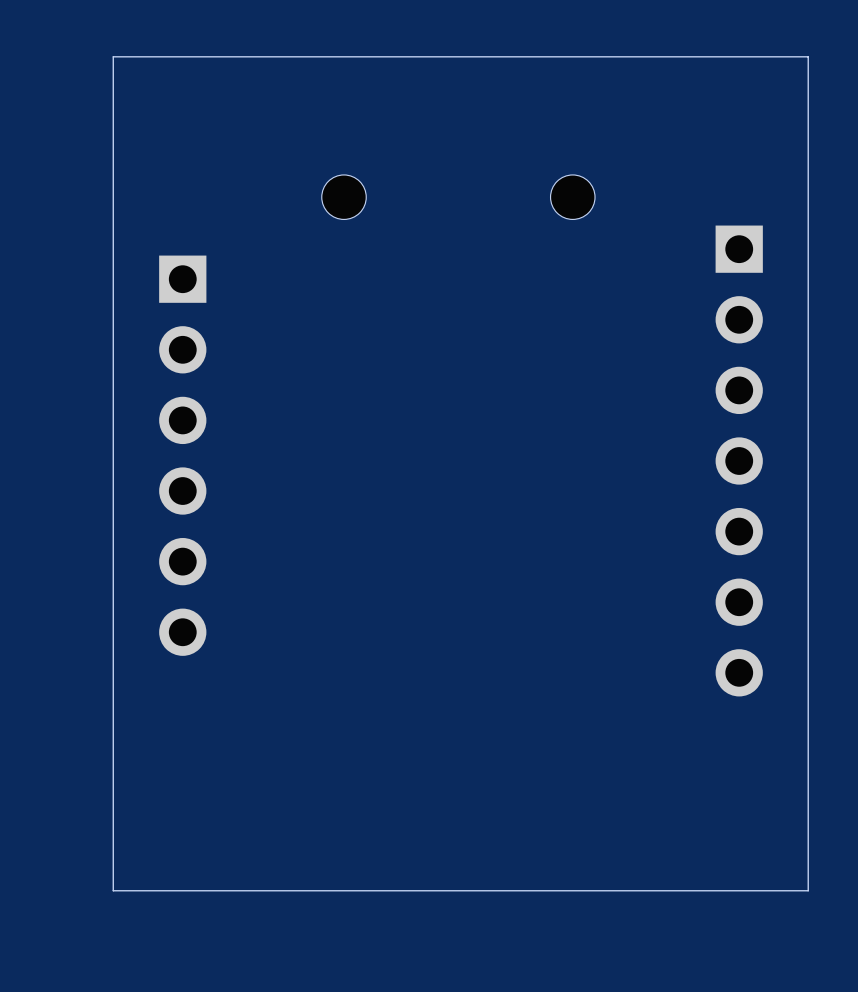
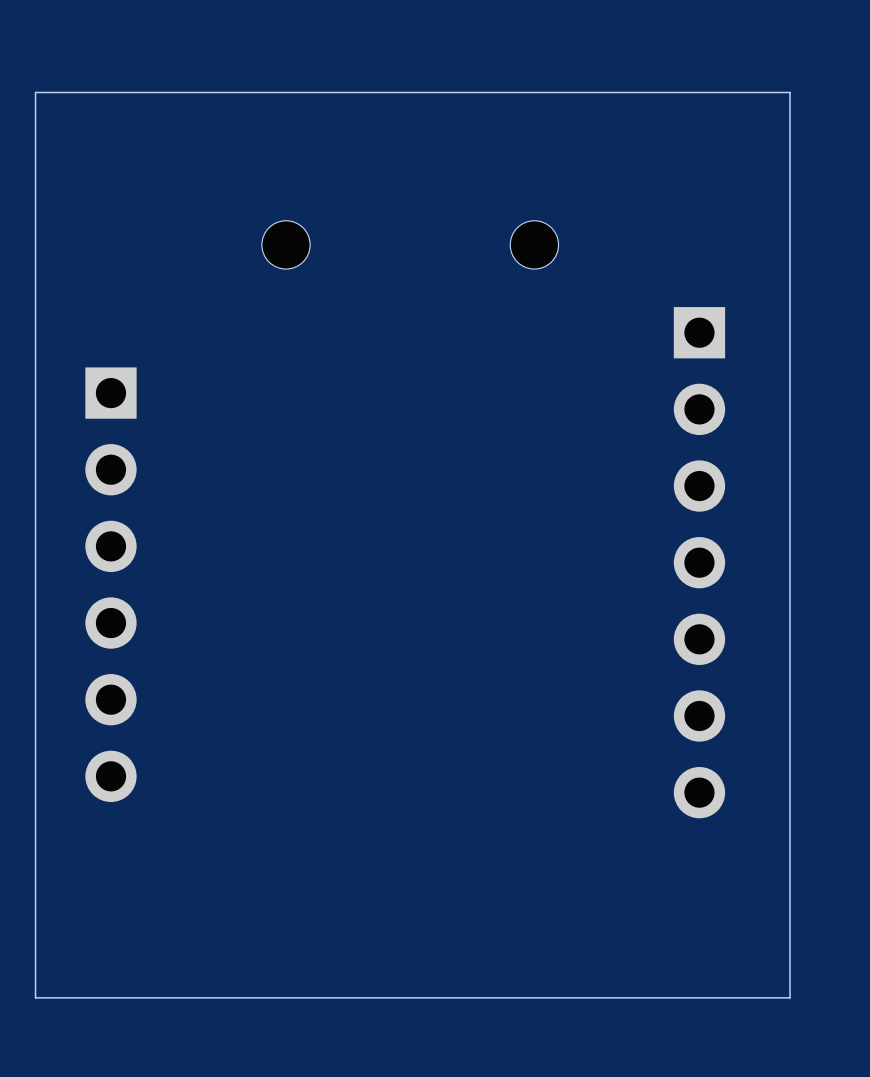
part position: (182, 455) -> (110, 584)
part position: (739, 461) -> (699, 562)

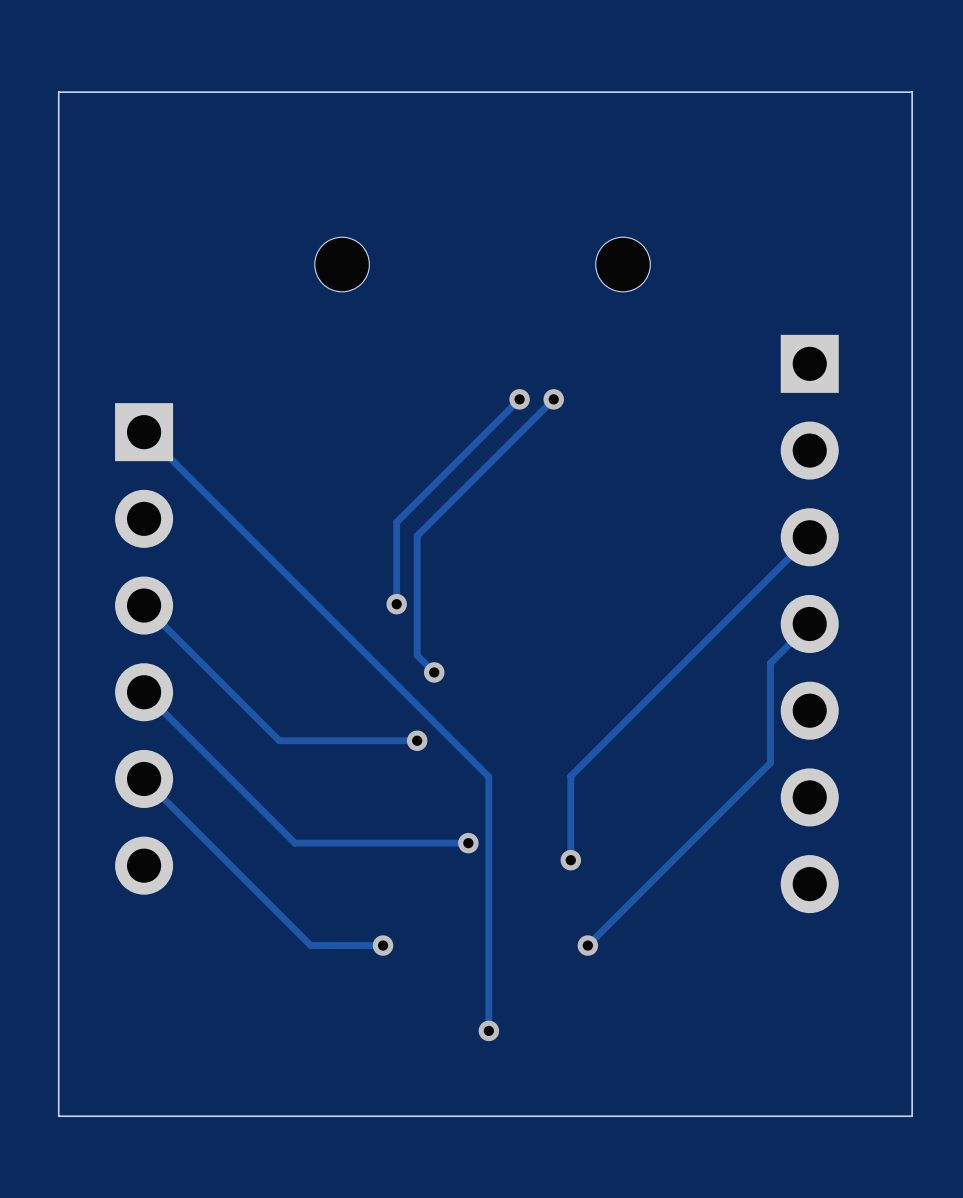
track: none -> (519, 399) (396, 522) (396, 604)
via: none -> (519, 399)
track: none -> (553, 399) (417, 535) (417, 655) (434, 672)
via: none -> (553, 399)
track: none -> (144, 432) (488, 776) (488, 1030)
track: none -> (809, 537) (570, 776) (570, 860)
via: none -> (396, 604)
track: none -> (144, 605) (279, 740) (417, 740)
track: none -> (809, 623) (770, 663) (770, 762) (587, 945)
via: none -> (434, 672)
track: none -> (144, 692) (294, 843) (468, 843)
via: none -> (417, 740)
track: none -> (144, 778) (310, 945) (383, 945)
via: none -> (468, 843)
via: none -> (570, 860)
via: none -> (383, 945)
via: none -> (587, 945)
via: none -> (488, 1030)

